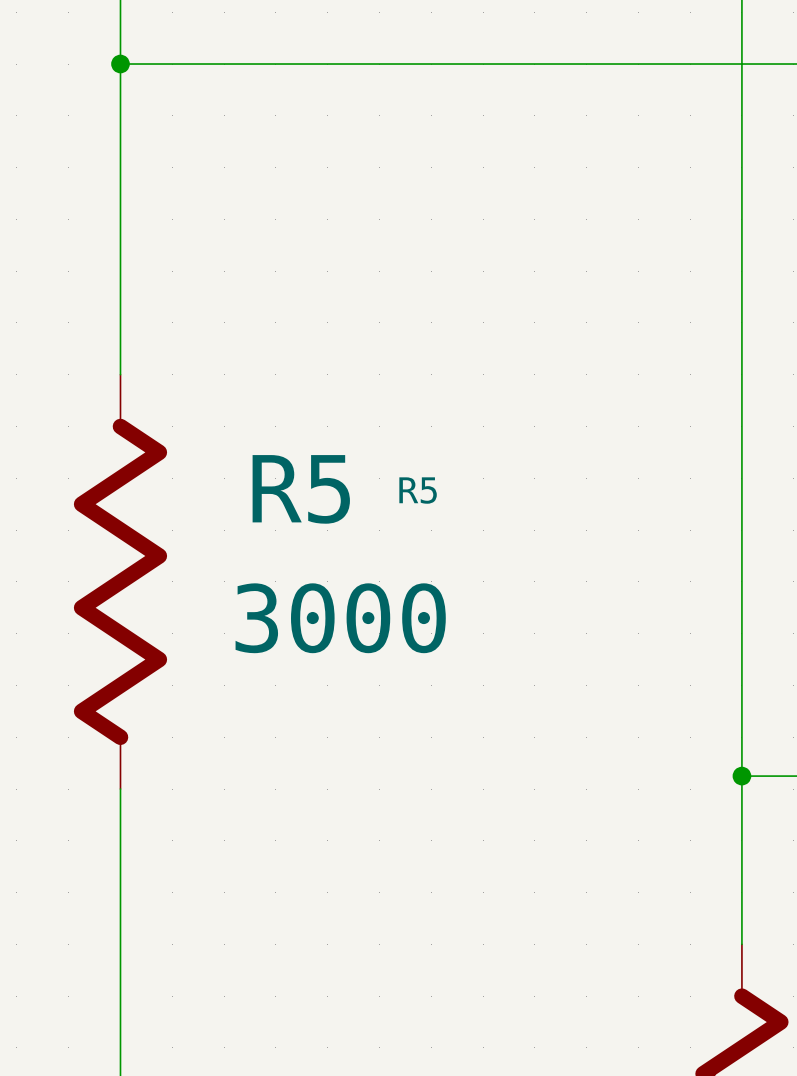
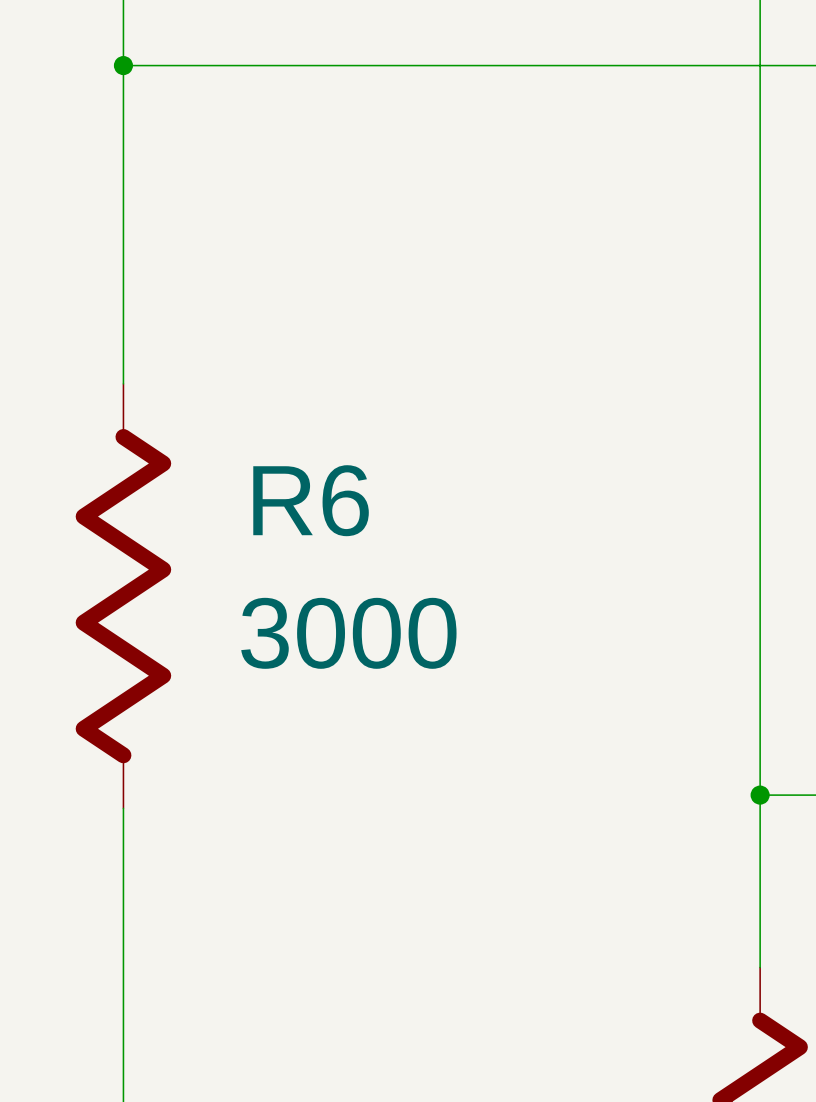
R5 text: R5 (301, 489) -> none
R5 name: R5 (418, 490) -> R6 (311, 500)

